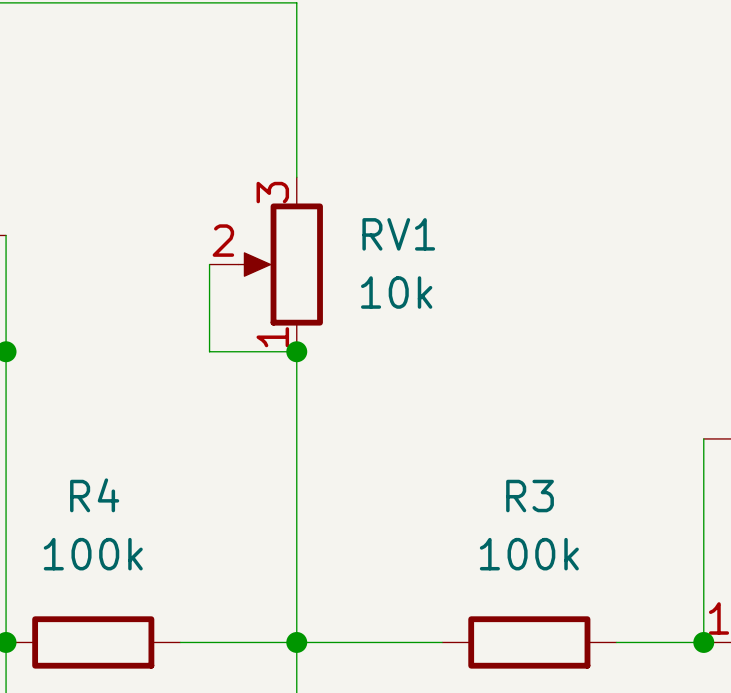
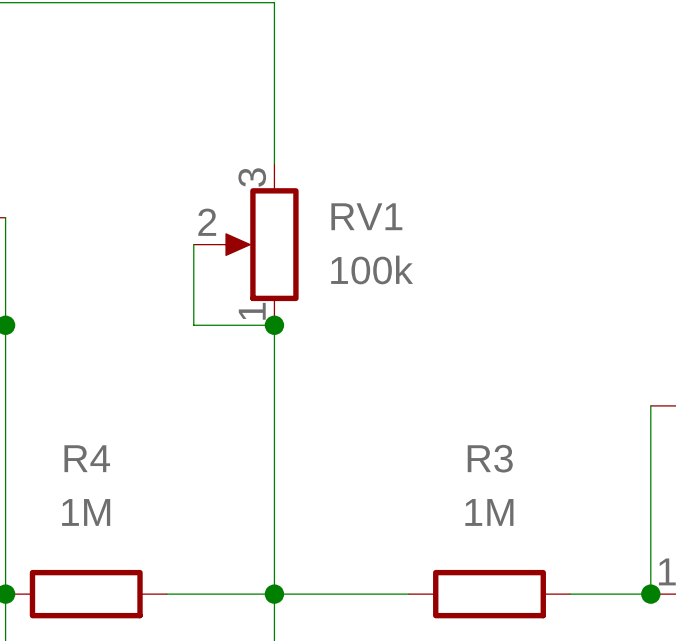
RV1 value: 10k (396, 292) -> 100k (372, 269)
R4 value: 100k (93, 554) -> 1M (86, 512)
R3 value: 100k (529, 554) -> 1M (489, 512)

